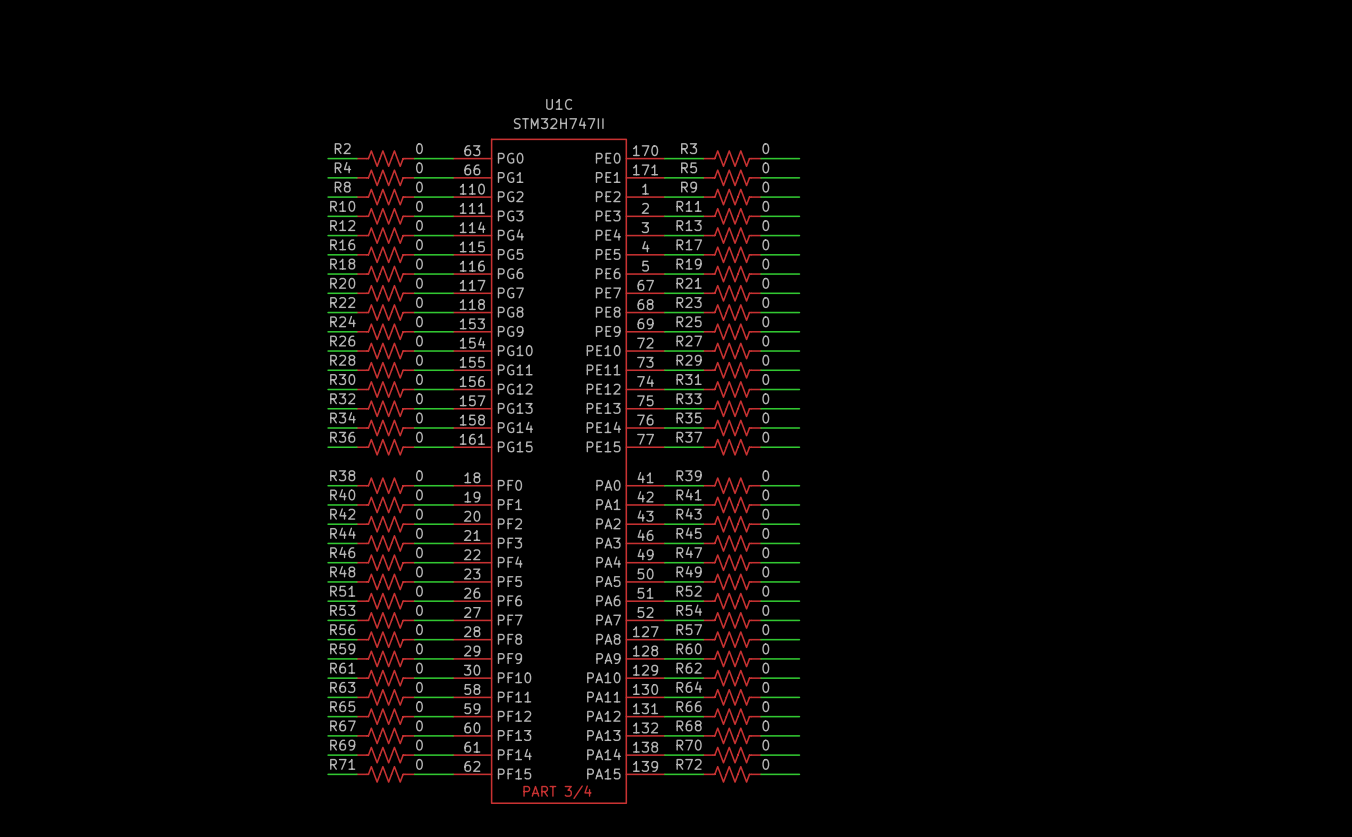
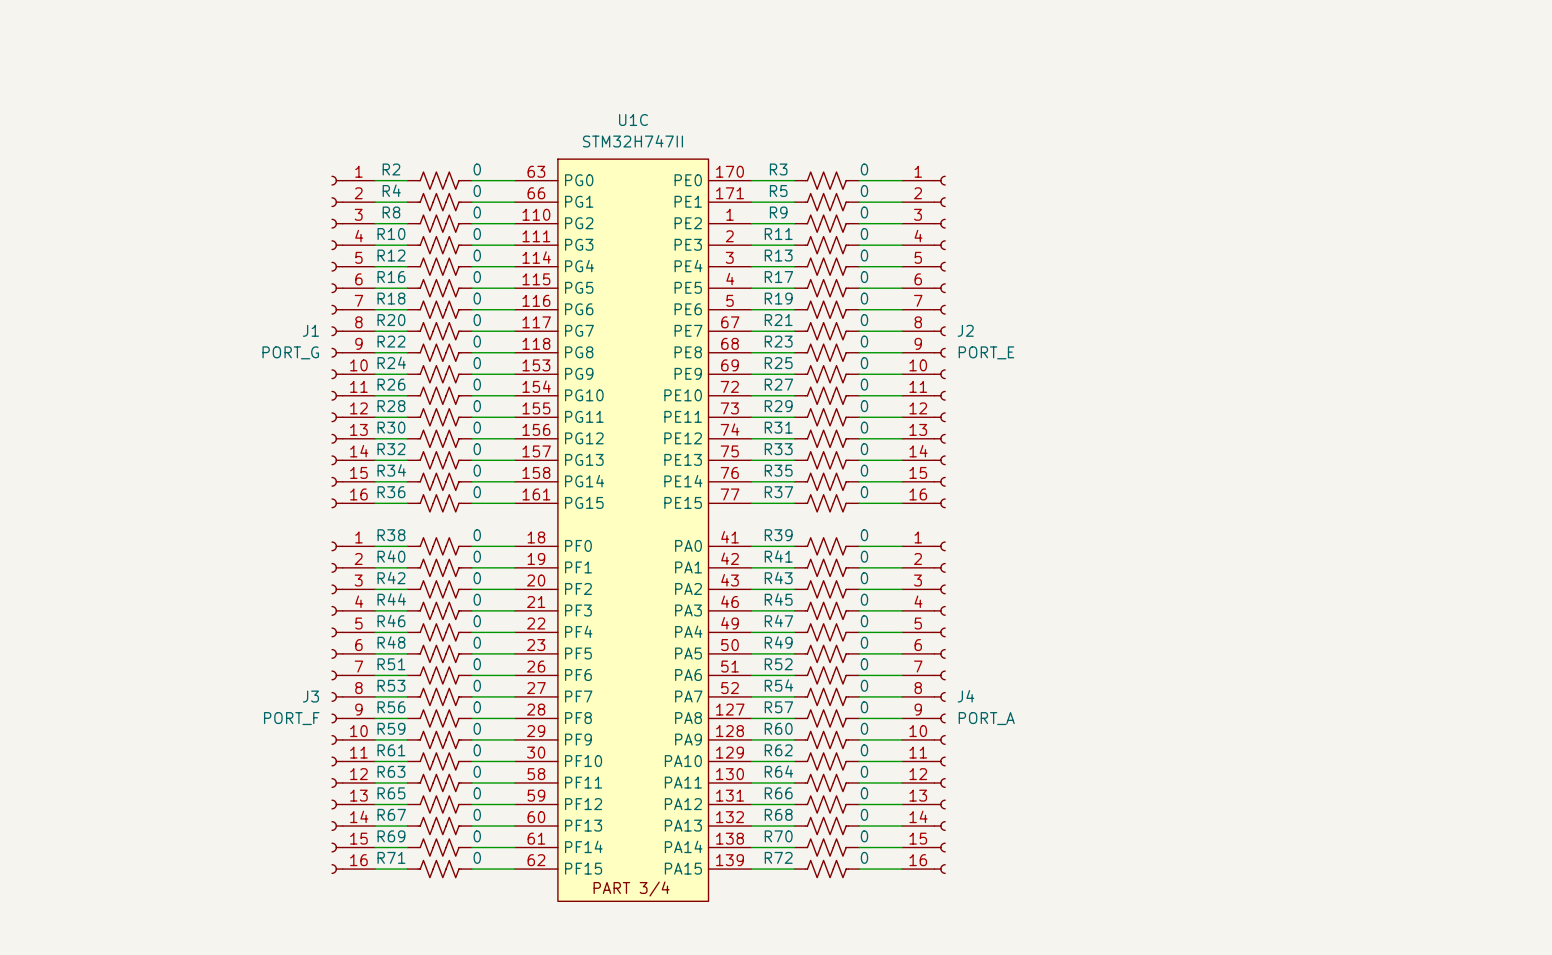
J1: none -> PORT_G (353, 341)
J2: none -> PORT_E (923, 341)
J3: none -> PORT_F (353, 707)
J4: none -> PORT_A (923, 707)

